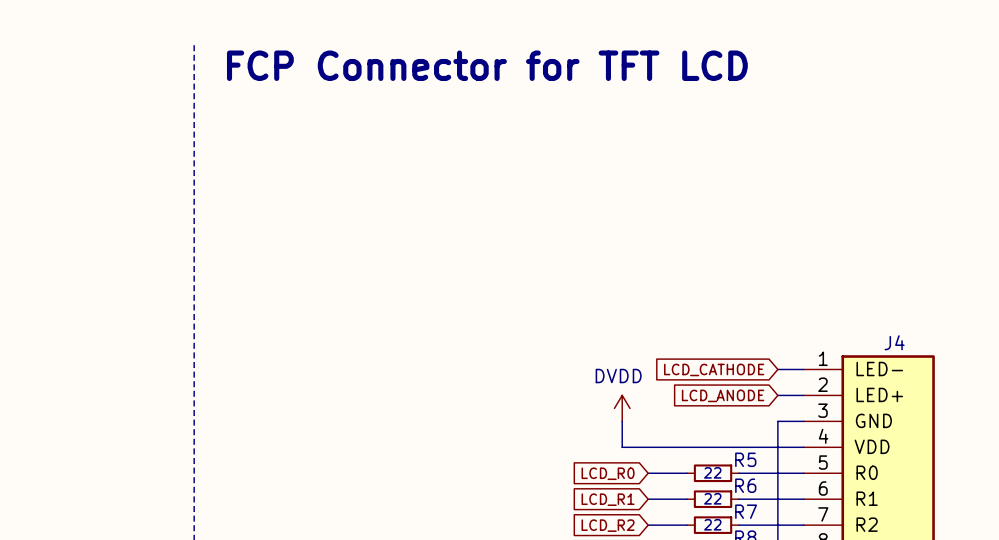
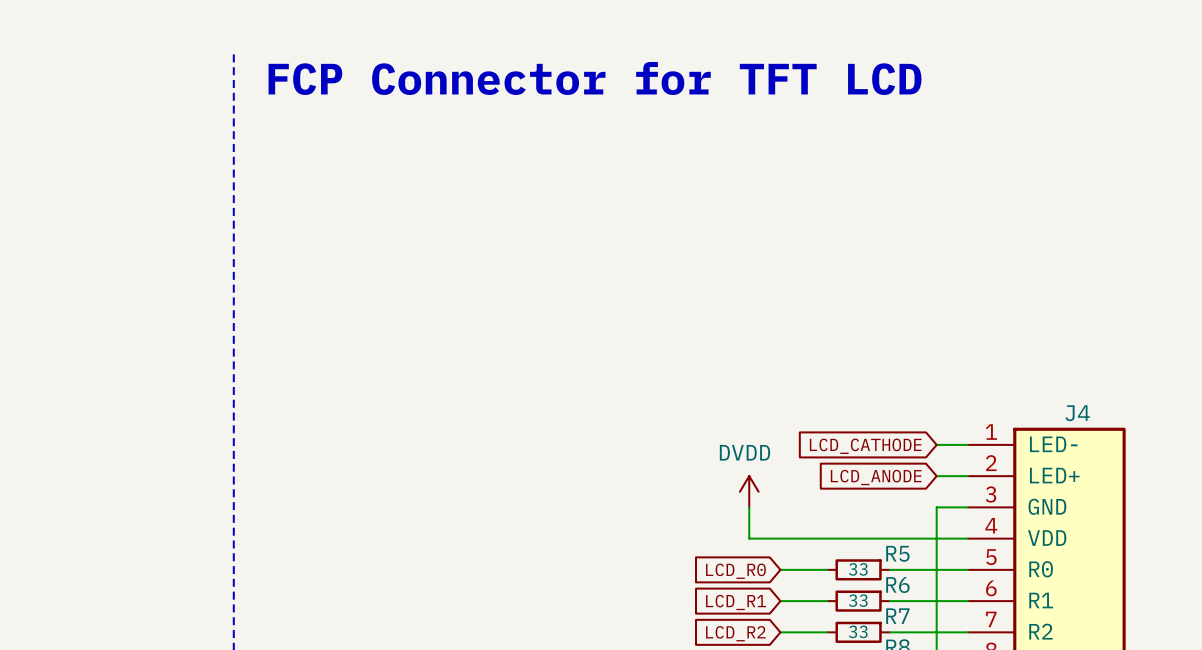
R5 value: 22 (712, 472) -> 33 (858, 569)
R6 value: 22 (712, 498) -> 33 (858, 600)
R7 value: 22 (712, 524) -> 33 (858, 631)

